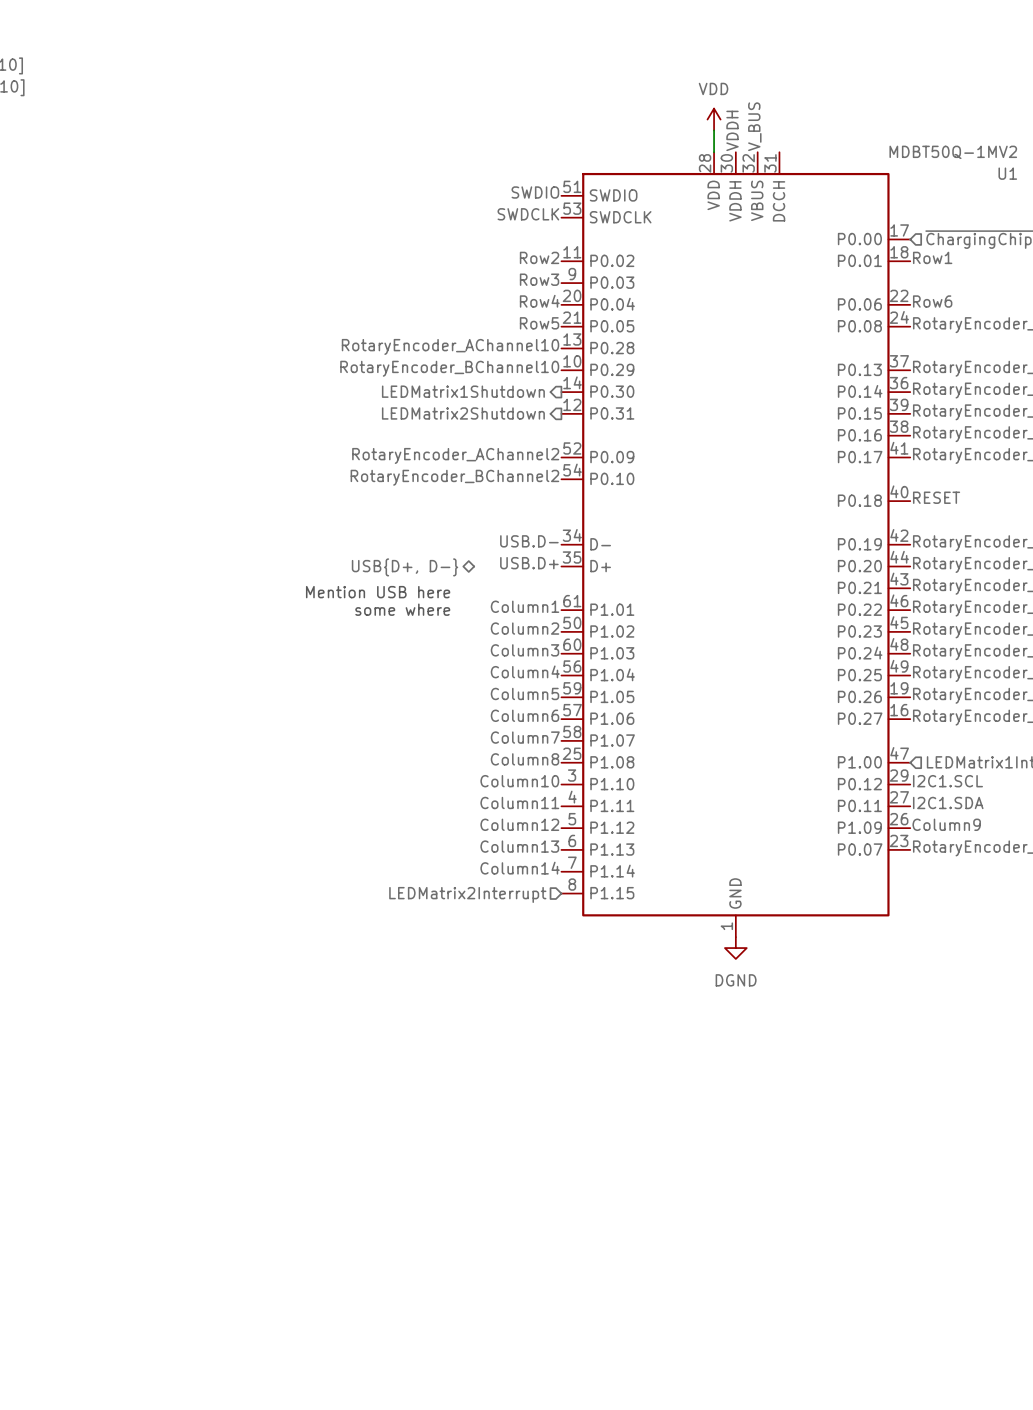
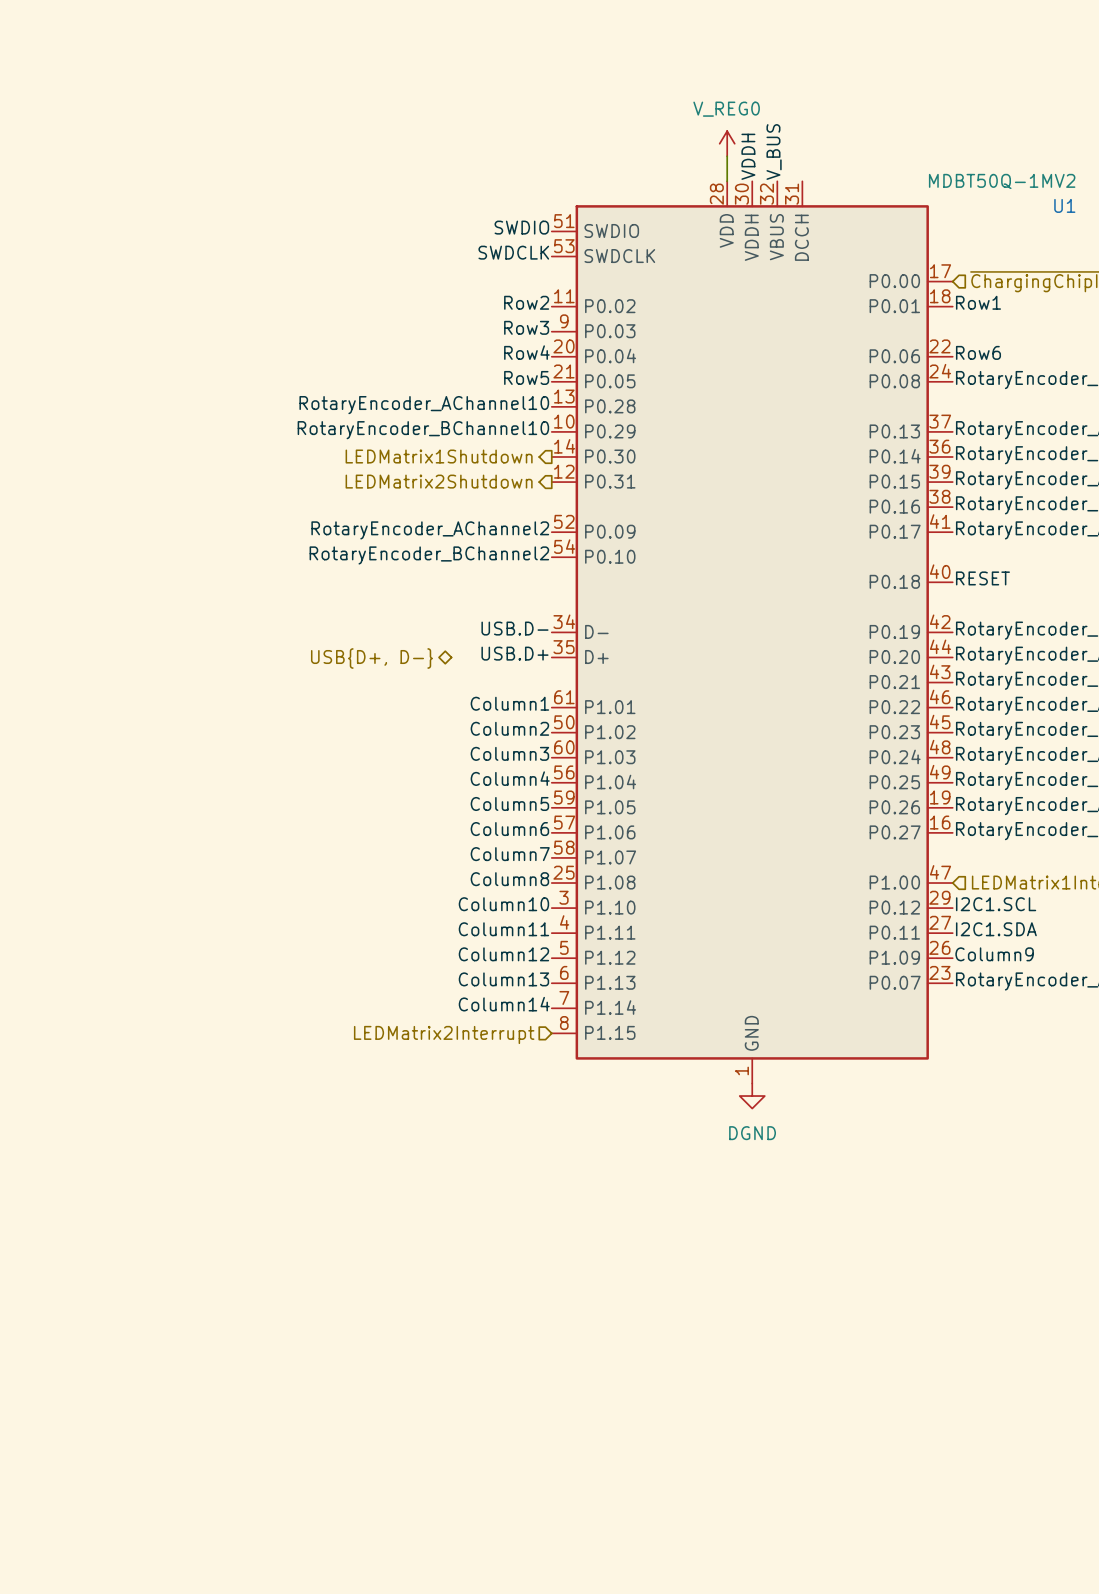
power symbol: VDD (714, 119) -> V_REG0 (727, 143)
text: Mention USB here (378, 592) -> none
text: some where (402, 609) -> none

